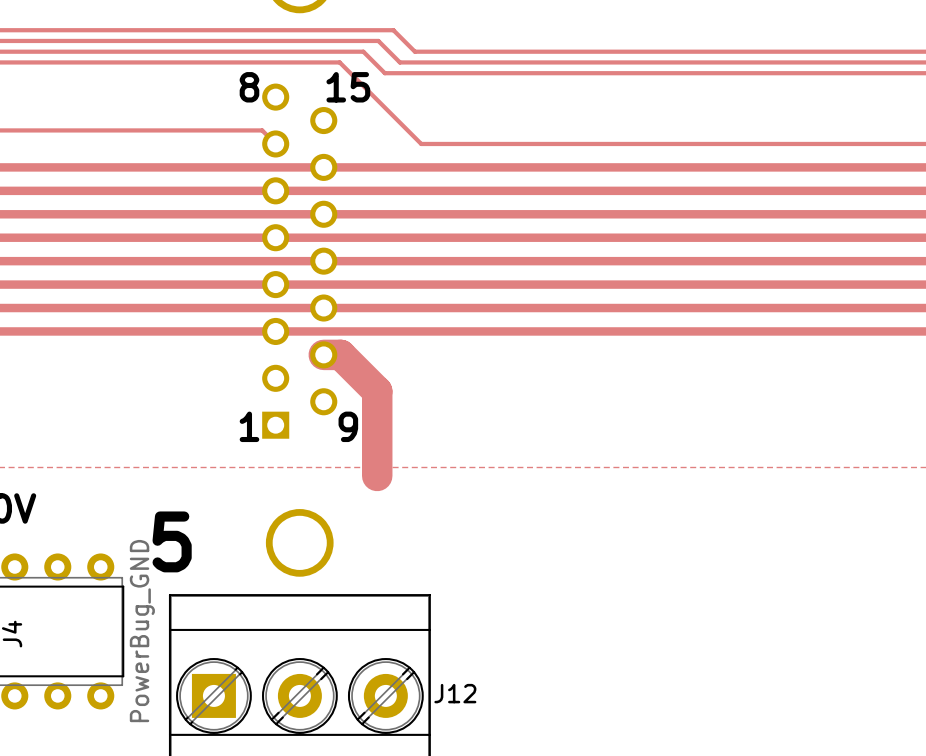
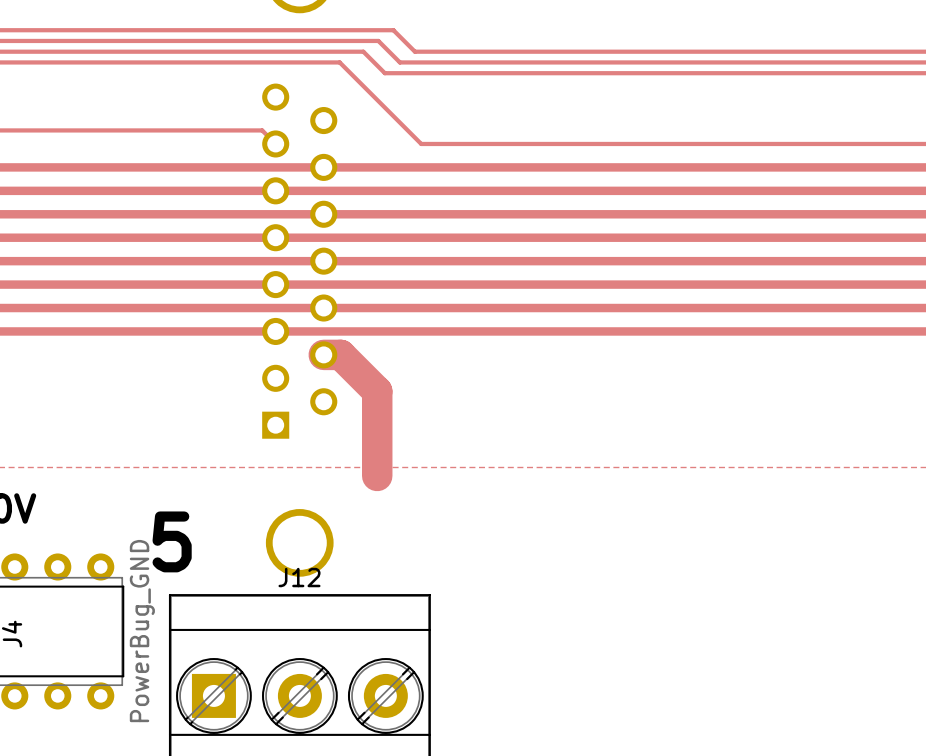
text: 8 (249, 87) -> none
text: 15 (348, 87) -> none
text: 1 (249, 426) -> none
text: 9 (348, 426) -> none
J12 name position: J12 (455, 693) -> J12 (299, 577)

